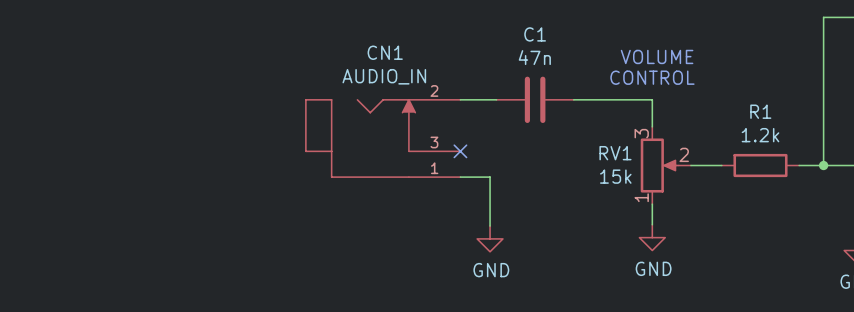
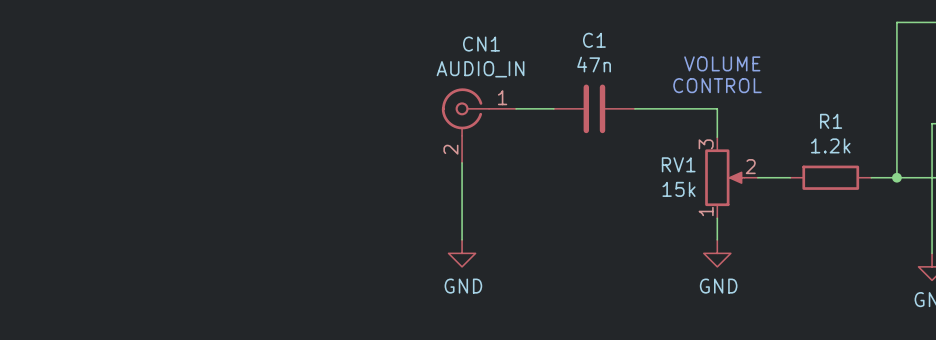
CN1 symbol: [305, 99, 461, 178] -> [441, 88, 517, 163]
wire: none -> (462, 162) (462, 239)
no-connect mark: (460, 151) -> none
wire: (460, 177) (490, 177) (490, 226) -> none
power symbol position: GND (490, 238) -> GND (462, 253)

